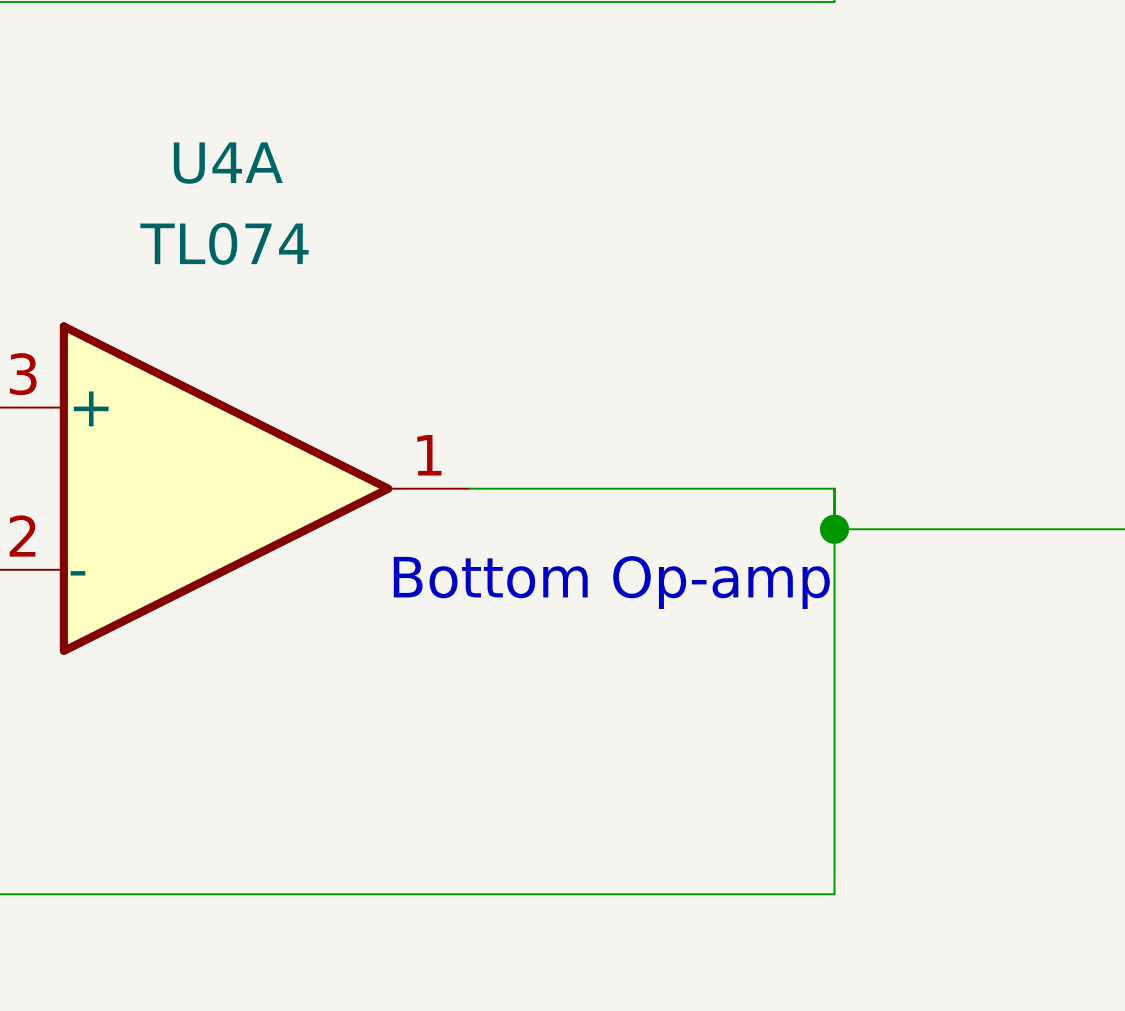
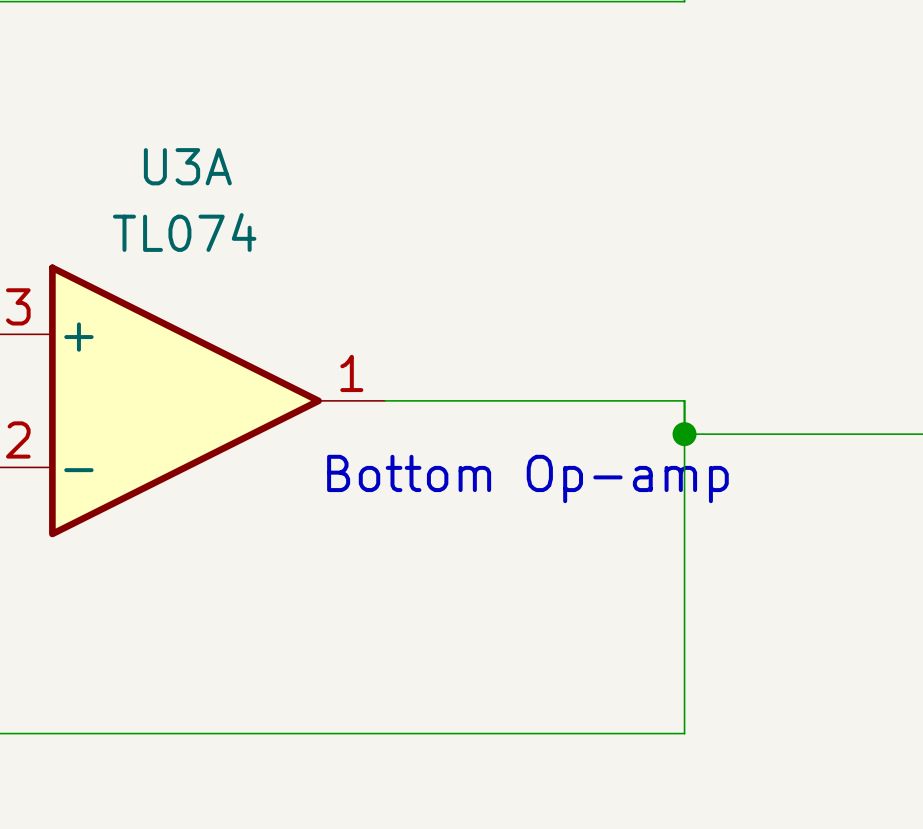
U4A name: U4A (228, 163) -> U3A (187, 166)
U4A value position: TL074 (224, 243) -> TL074 (184, 232)

